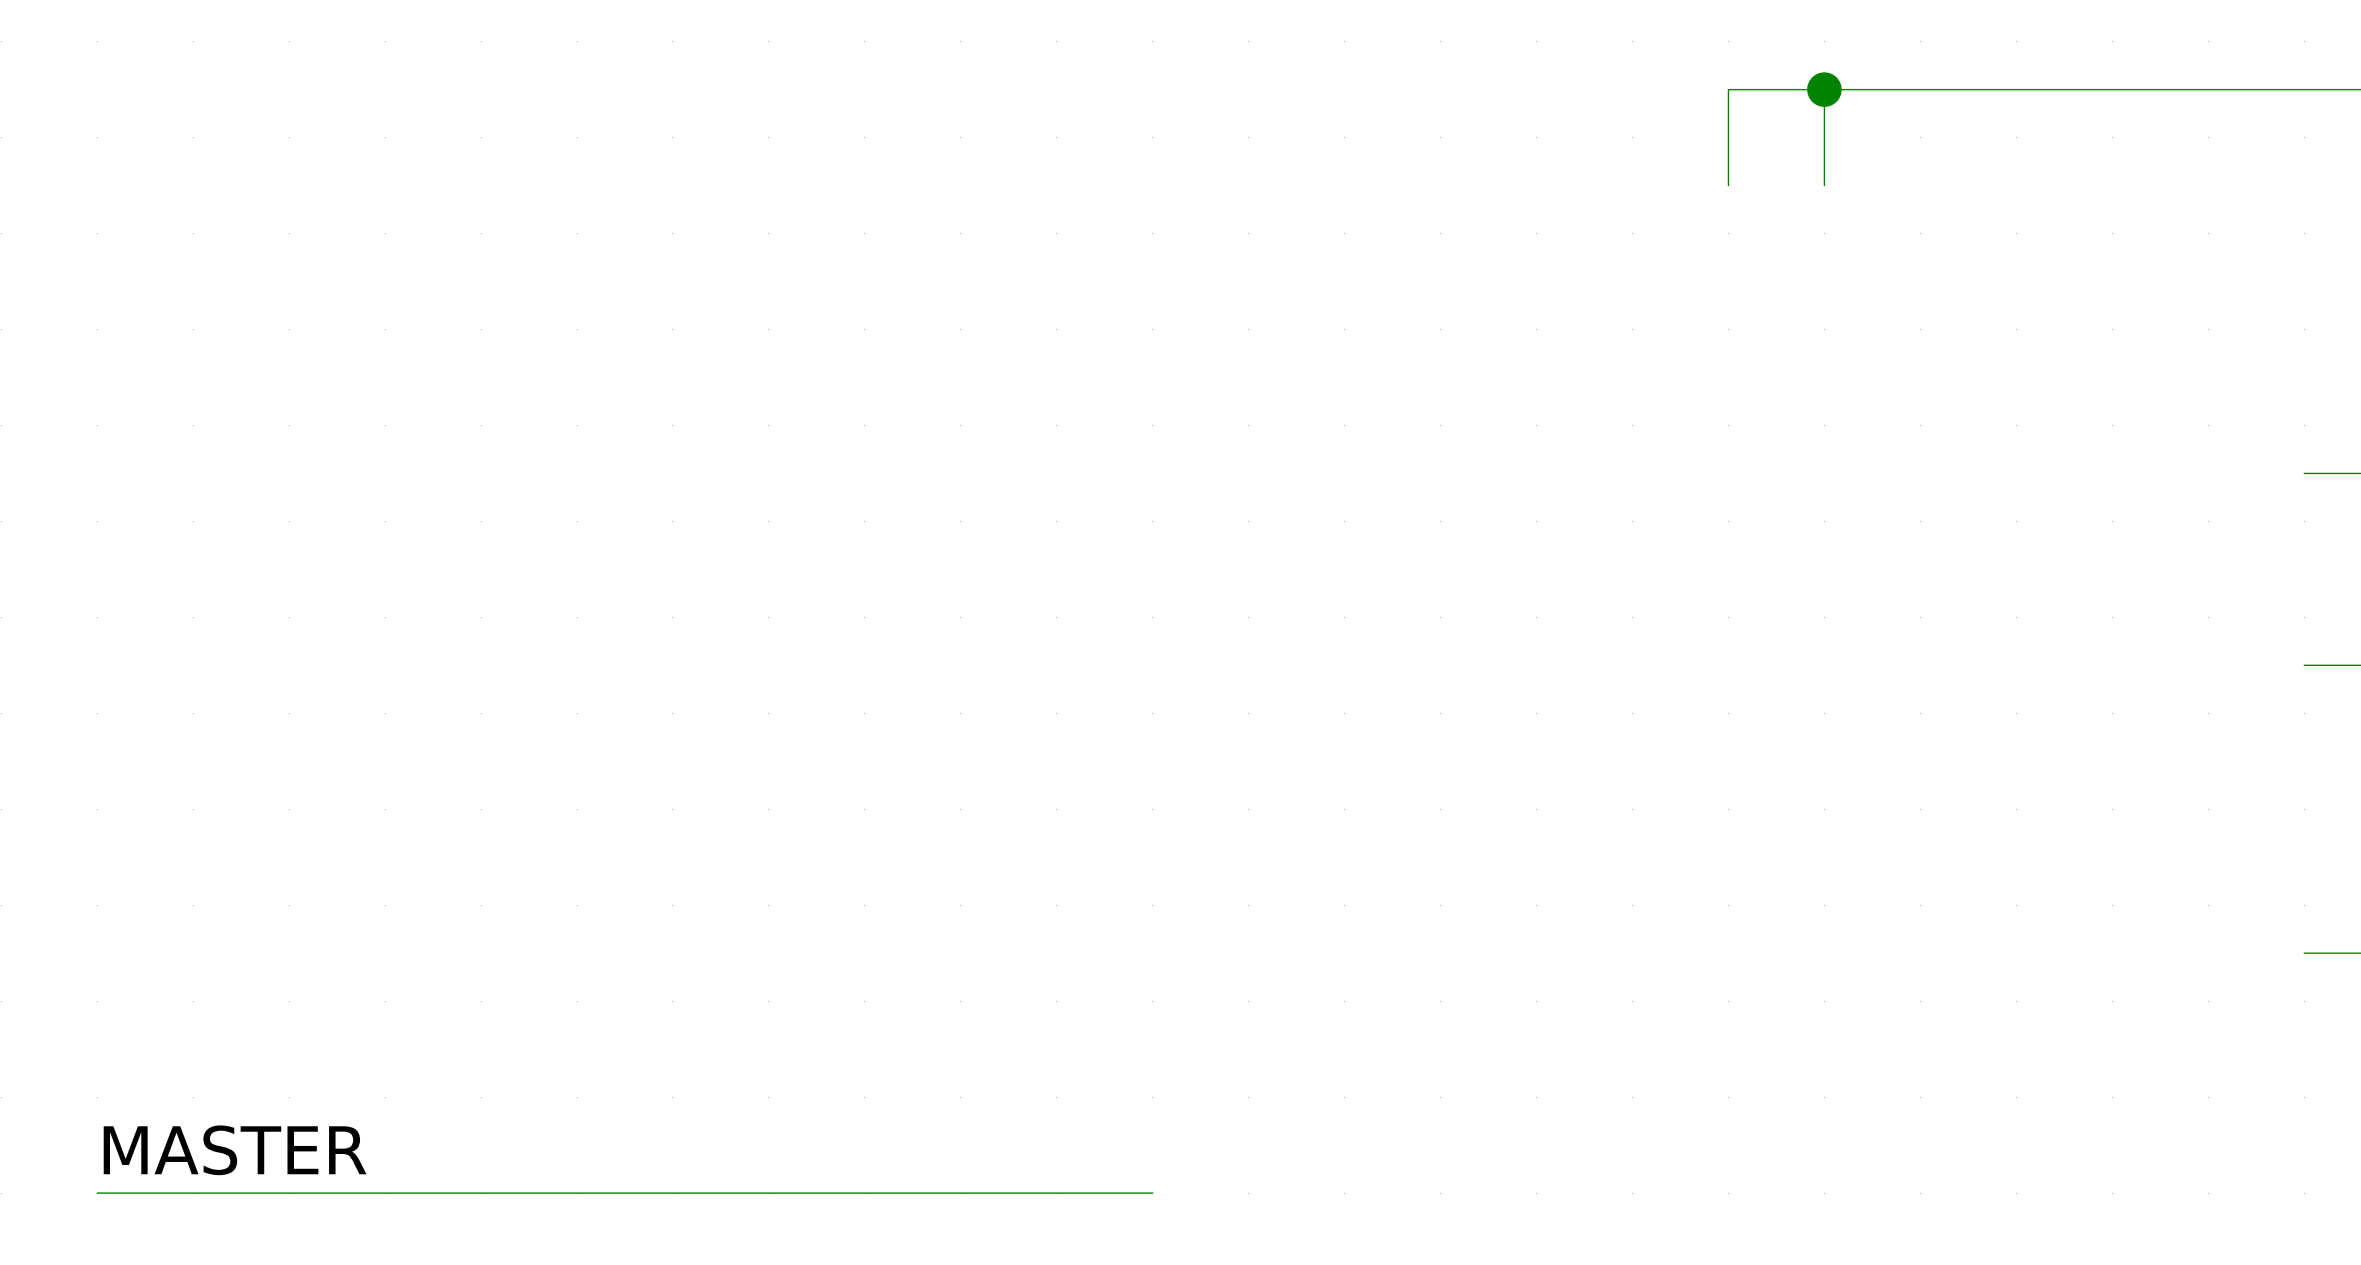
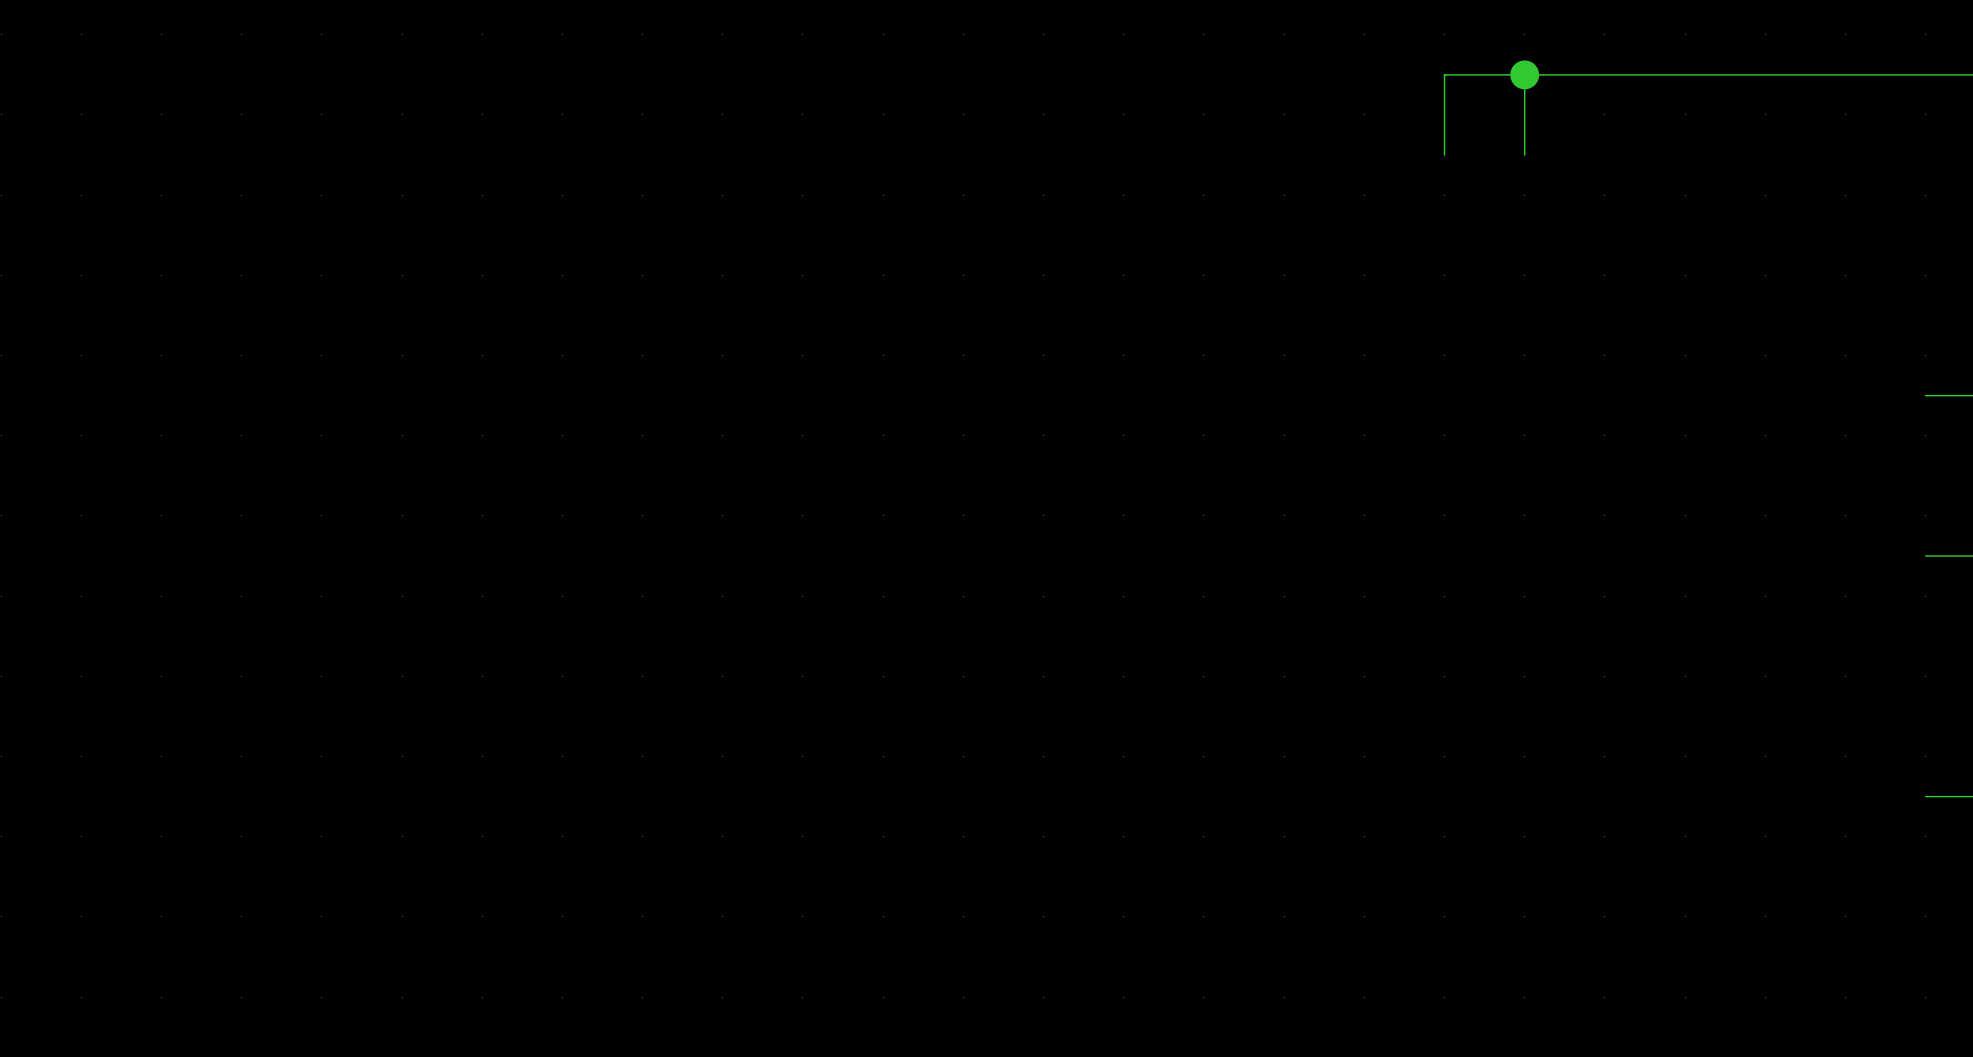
label: MASTER (235, 1150) -> none
wire: (97, 1193) (1152, 1193) -> none

